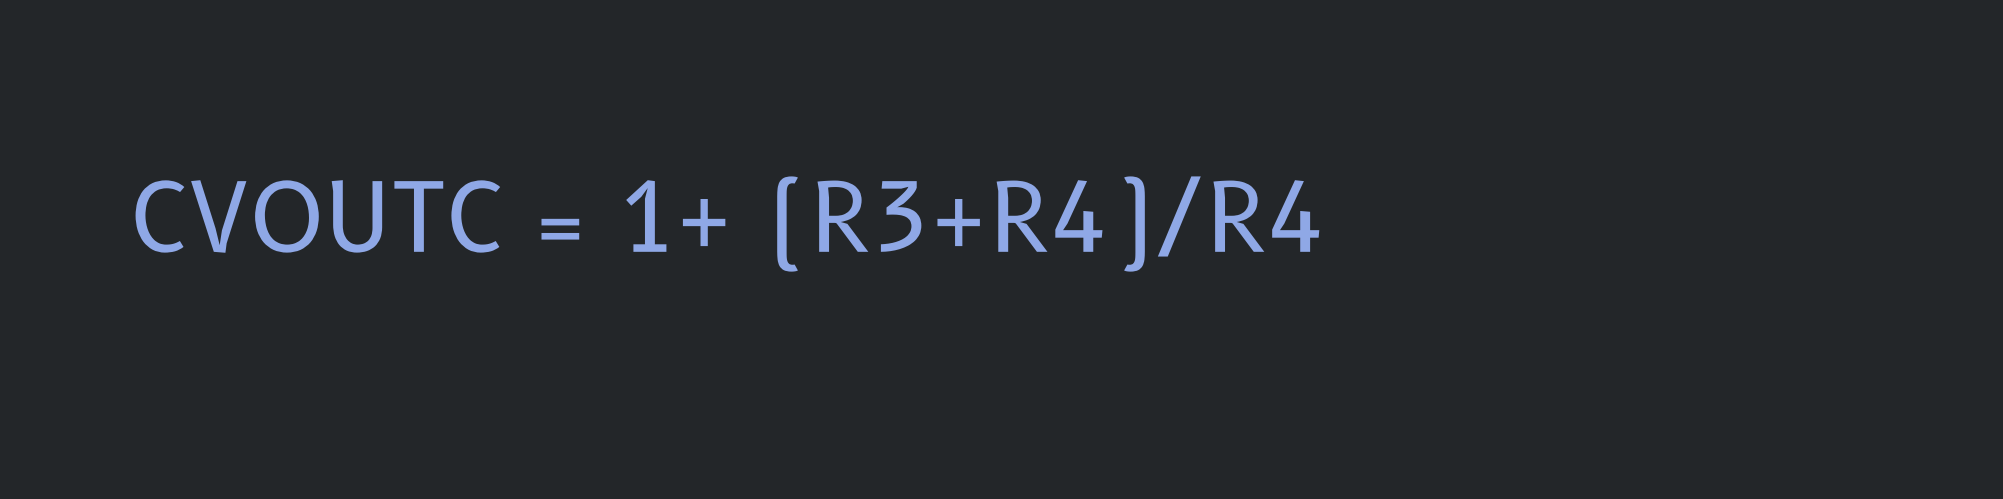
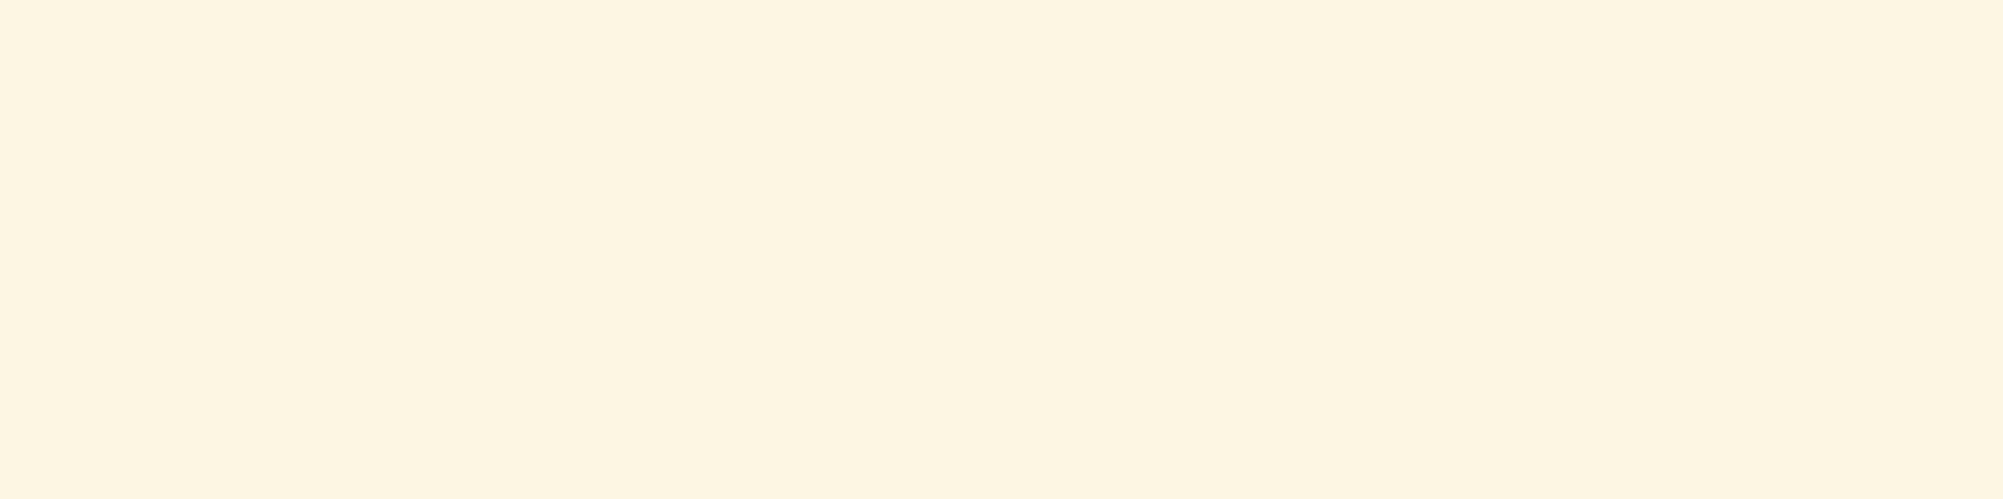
text: CVOUTC = 1+ (R3+R4)/R4 (727, 224) -> none

